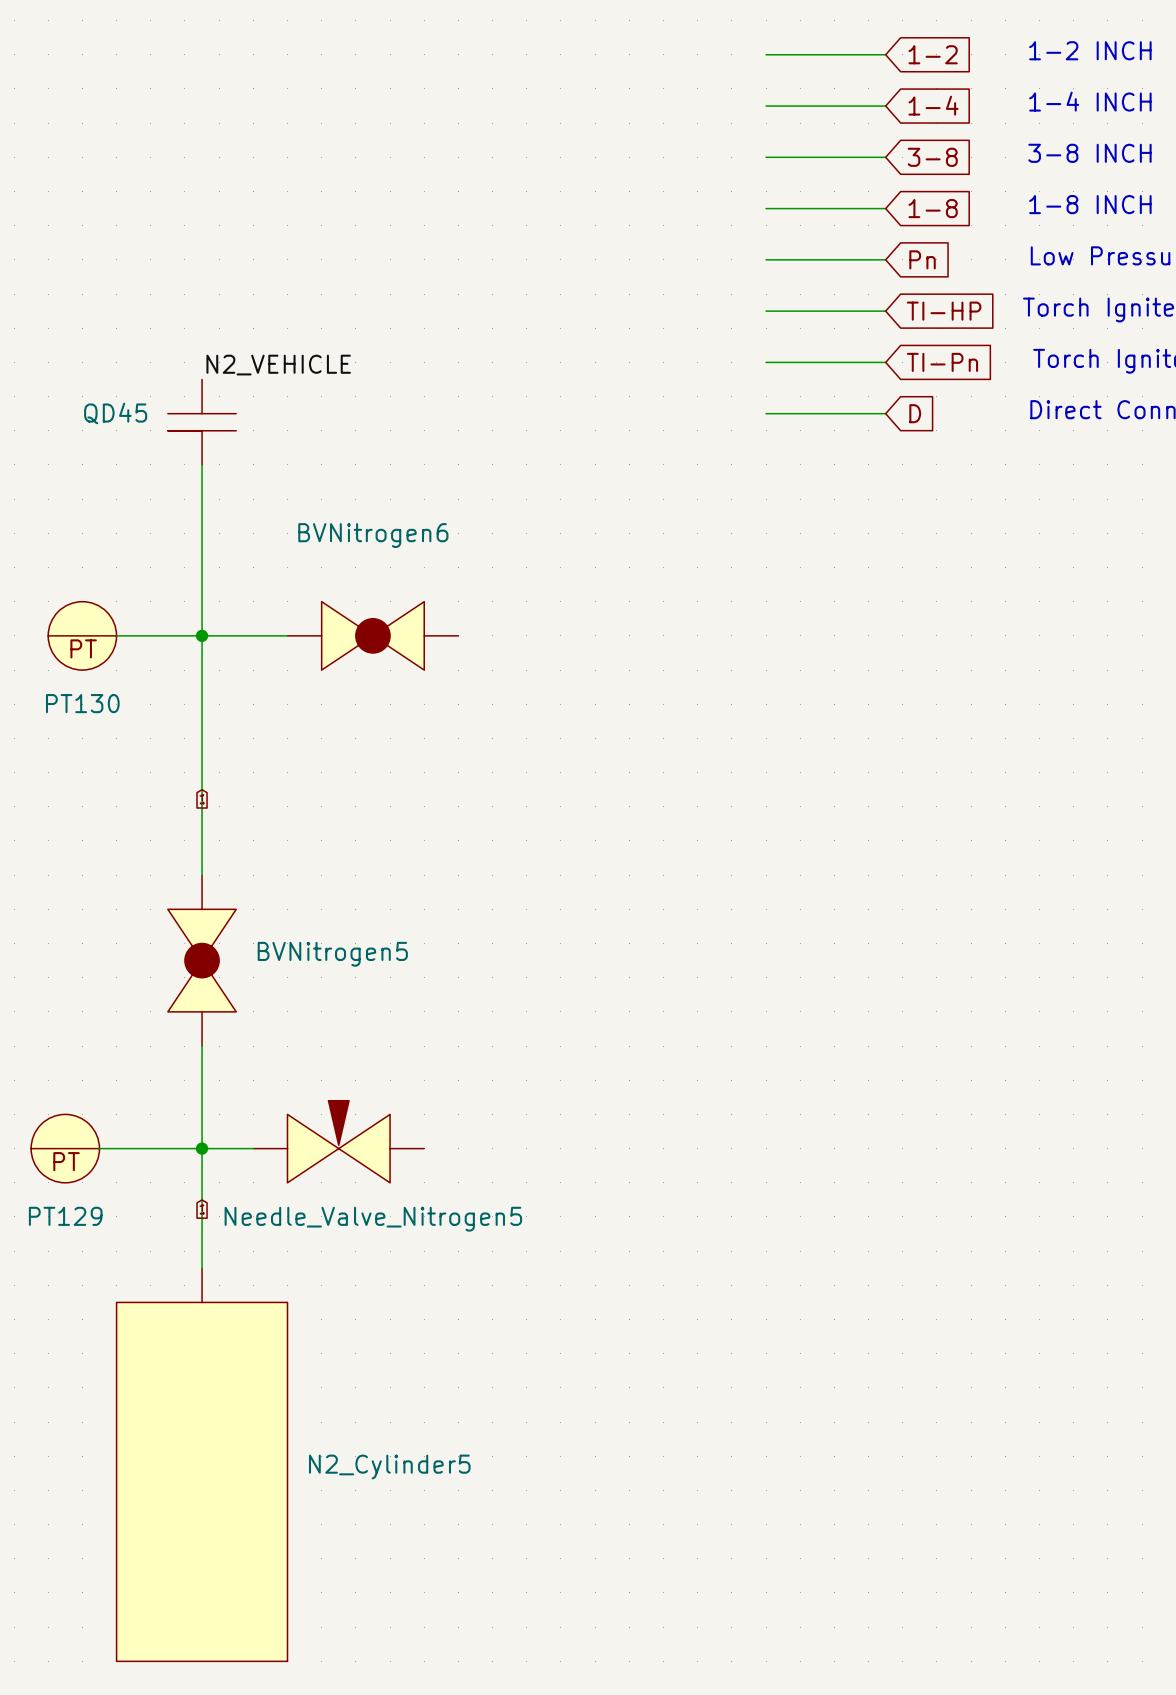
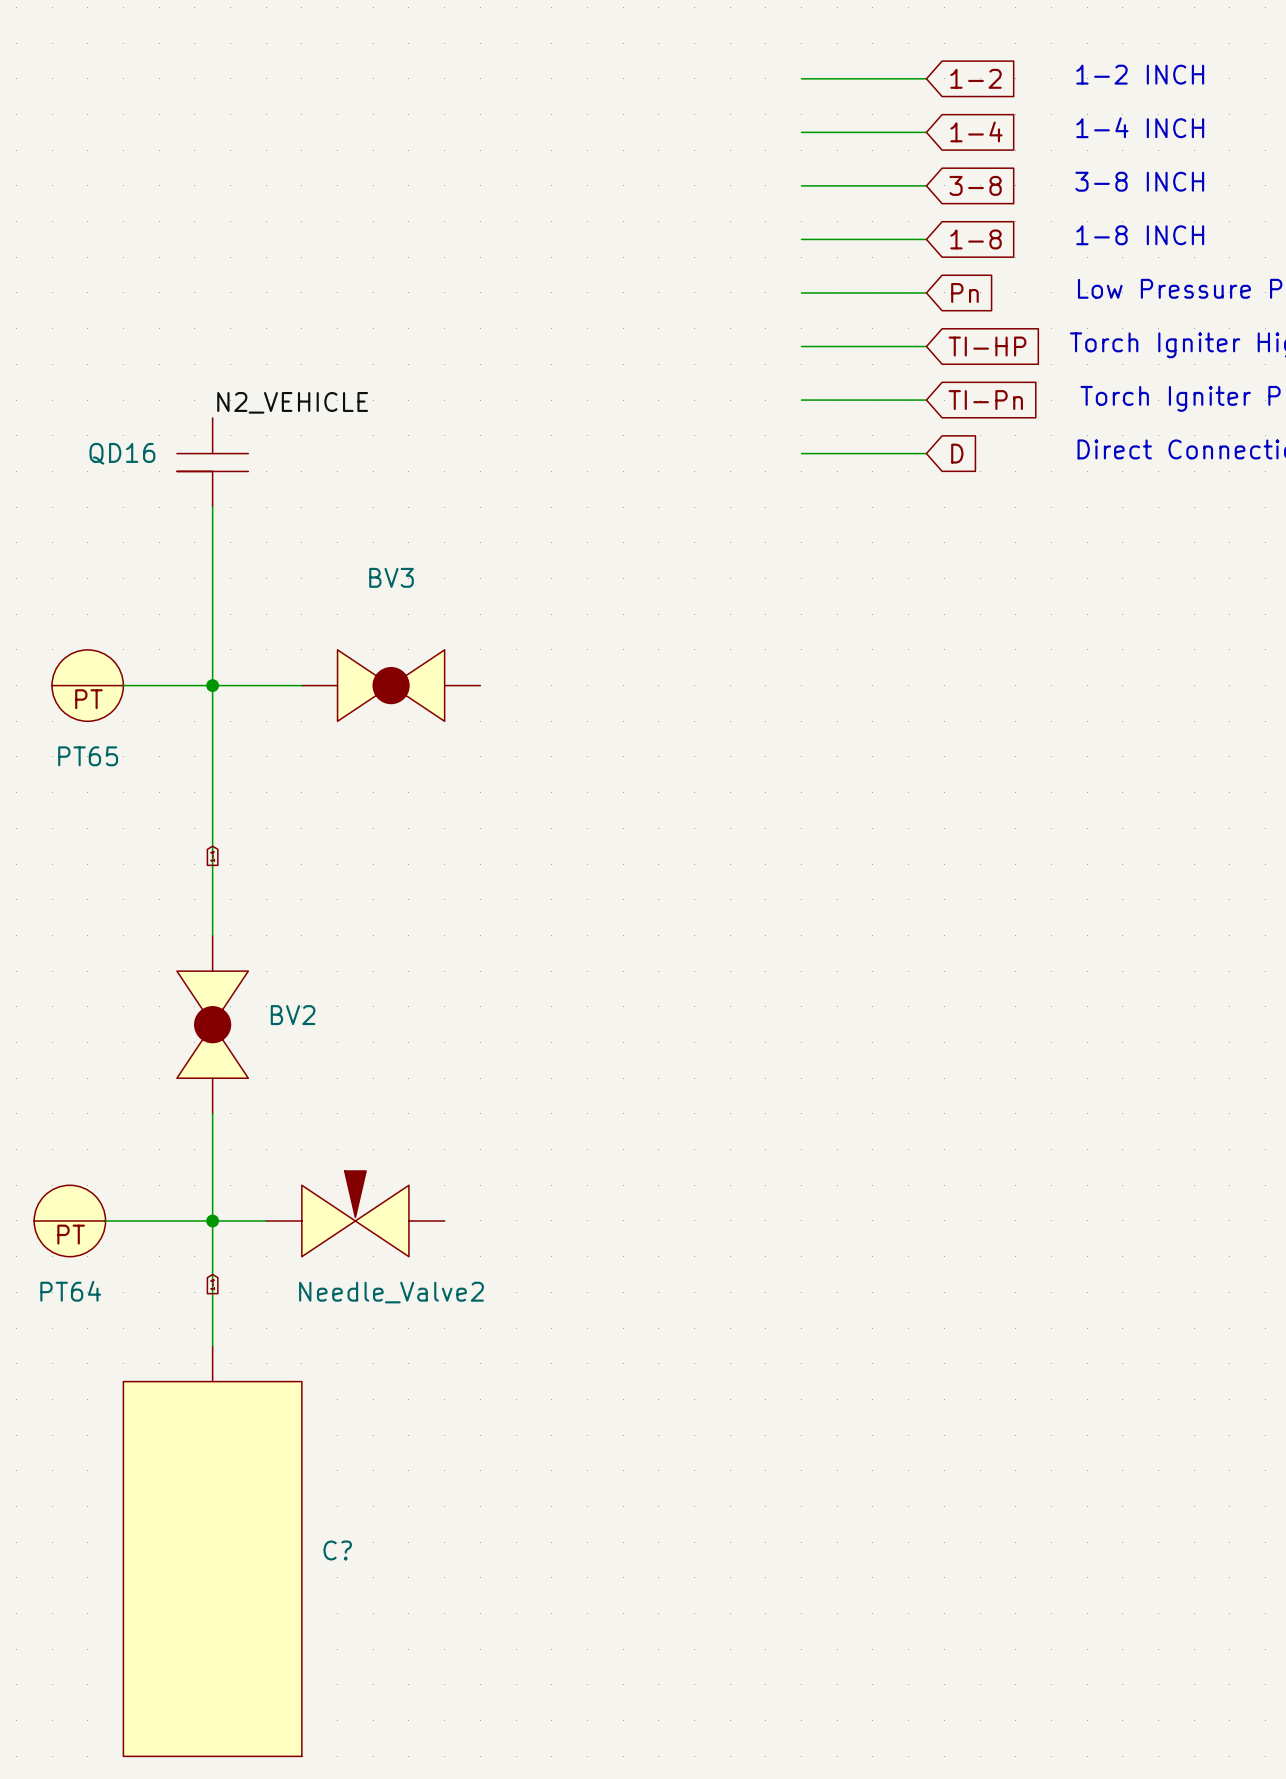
QD45 name: QD45 (115, 413) -> QD16 (122, 453)
BVNitrogen6 name: BVNitrogen6 (373, 535) -> BV3 (391, 577)
PT130 name: PT130 (82, 703) -> PT65 (88, 756)
BVNitrogen5 name: BVNitrogen5 (332, 954) -> BV2 (293, 1015)
PT129 name: PT129 (65, 1216) -> PT64 (70, 1291)
Needle_Valve_Nitrogen5 name: Needle_Valve_Nitrogen5 (373, 1219) -> Needle_Valve2 (391, 1292)
N2_Cylinder5 name: N2_Cylinder5 (389, 1467) -> C? (337, 1550)

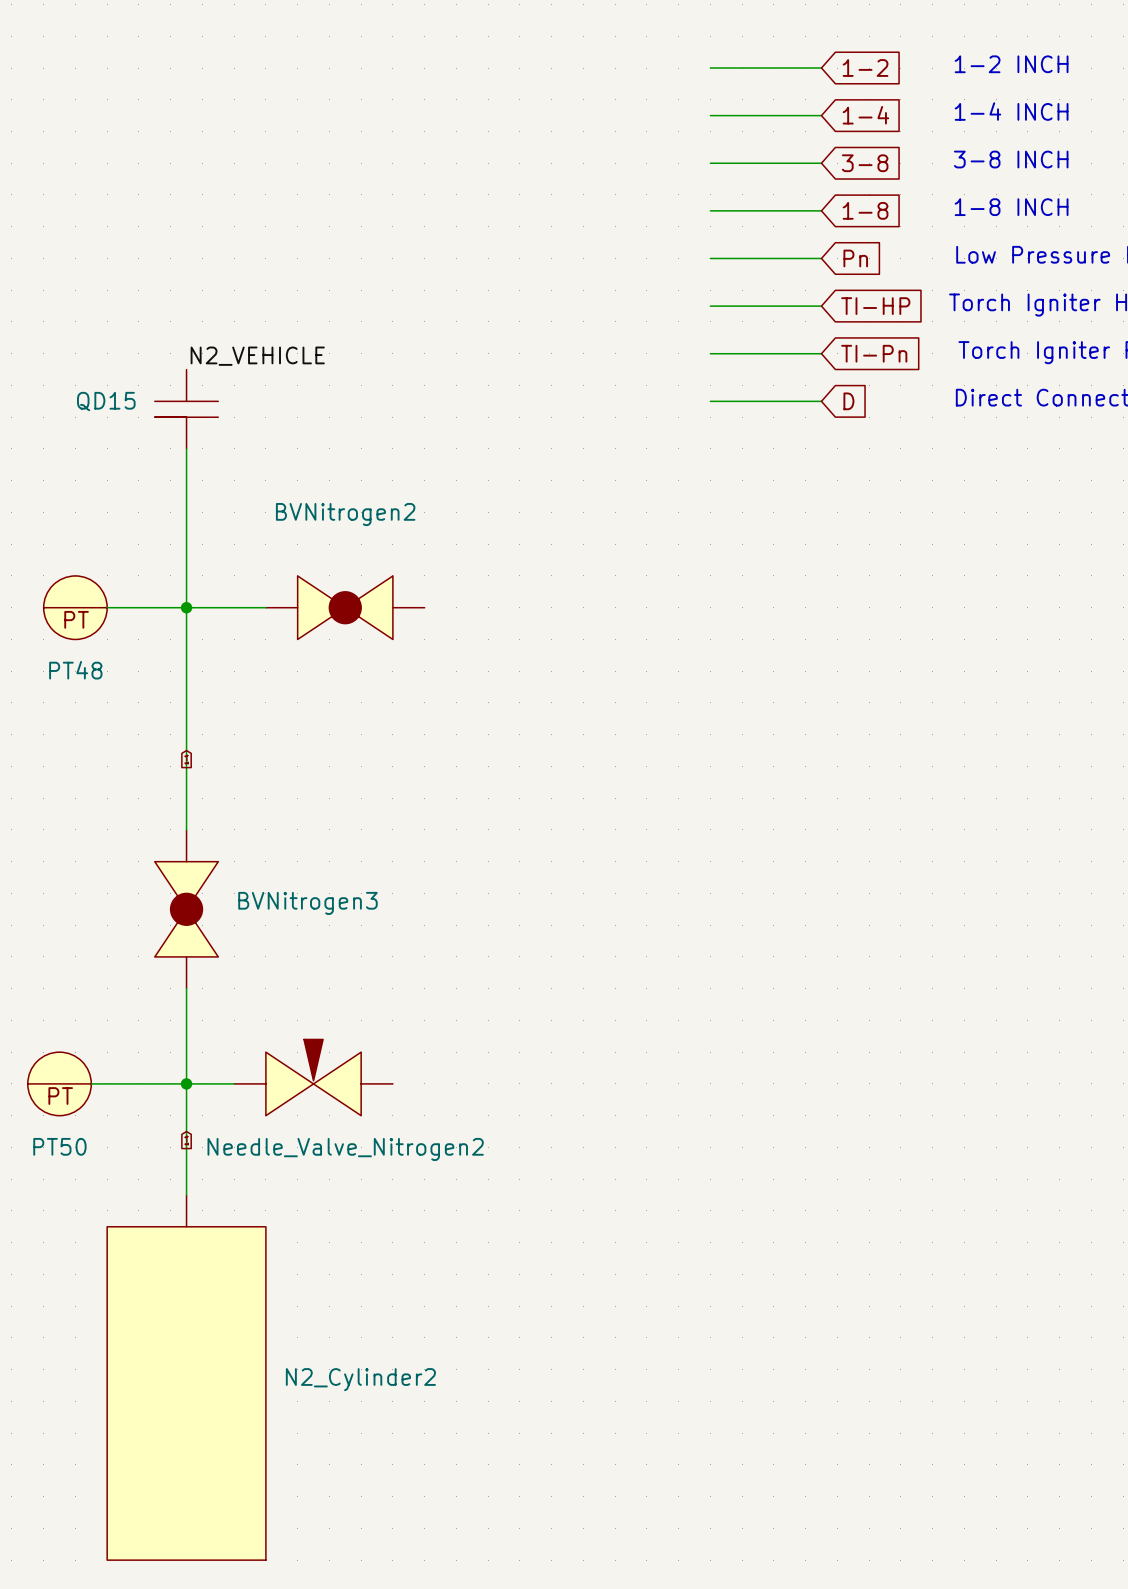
QD16 name: QD16 (122, 453) -> QD15 (106, 401)
BV3 name: BV3 (391, 577) -> BVNitrogen2 (345, 514)
PT65 name: PT65 (88, 756) -> PT48 (75, 670)
BV2 name: BV2 (293, 1015) -> BVNitrogen3 (307, 903)
PT64 name: PT64 (70, 1291) -> PT50 (59, 1146)
Needle_Valve2 name: Needle_Valve2 (391, 1292) -> Needle_Valve_Nitrogen2 (345, 1149)
C? name: C? (337, 1550) -> N2_Cylinder2 (360, 1379)

